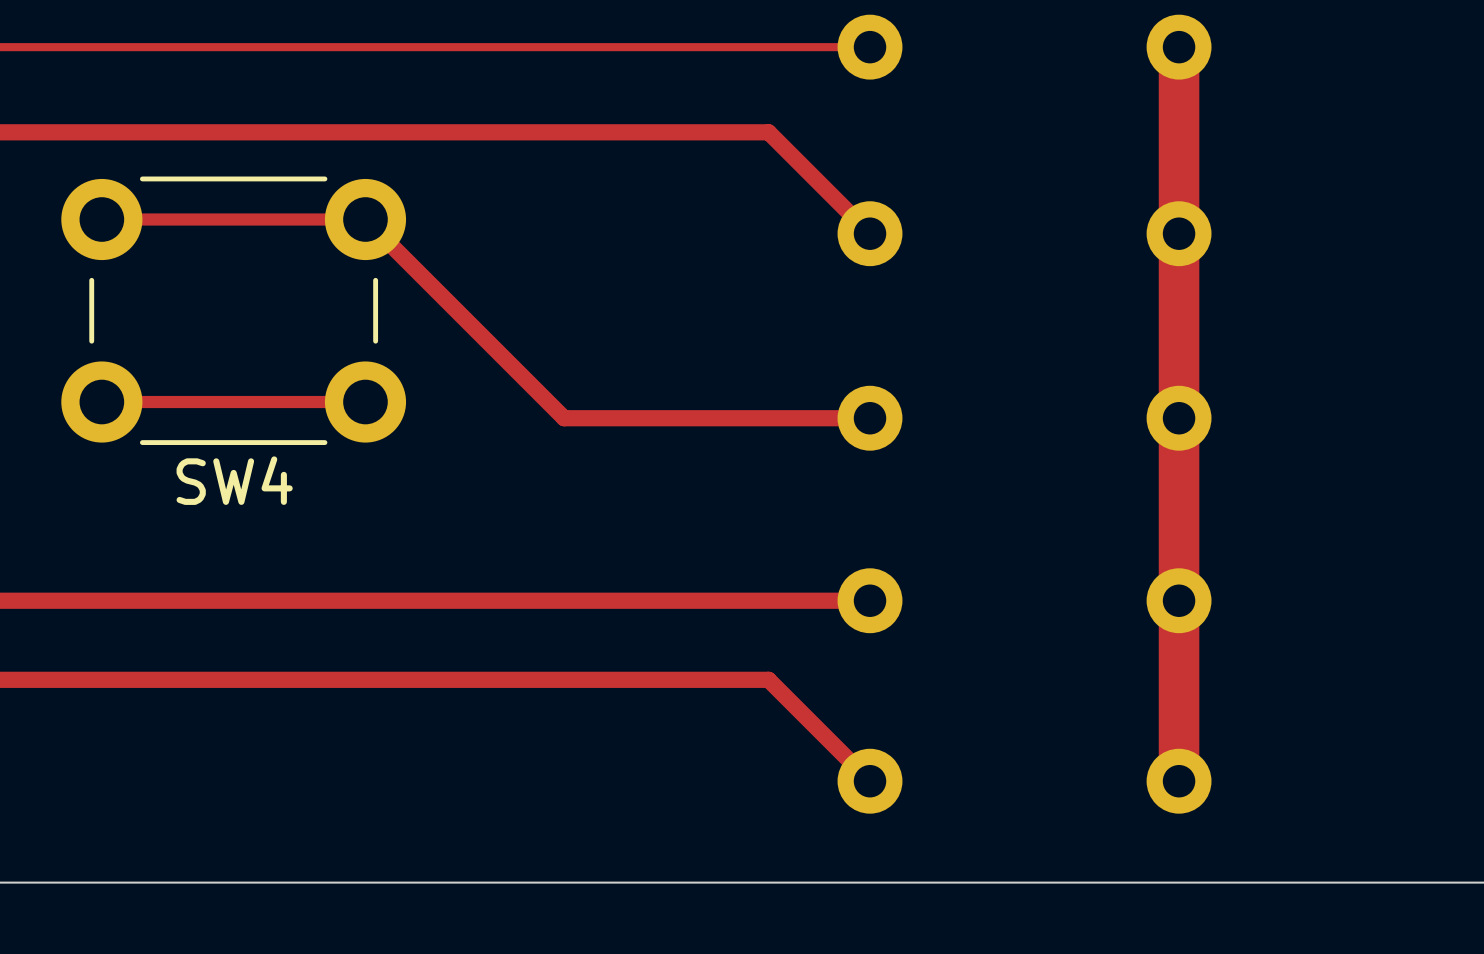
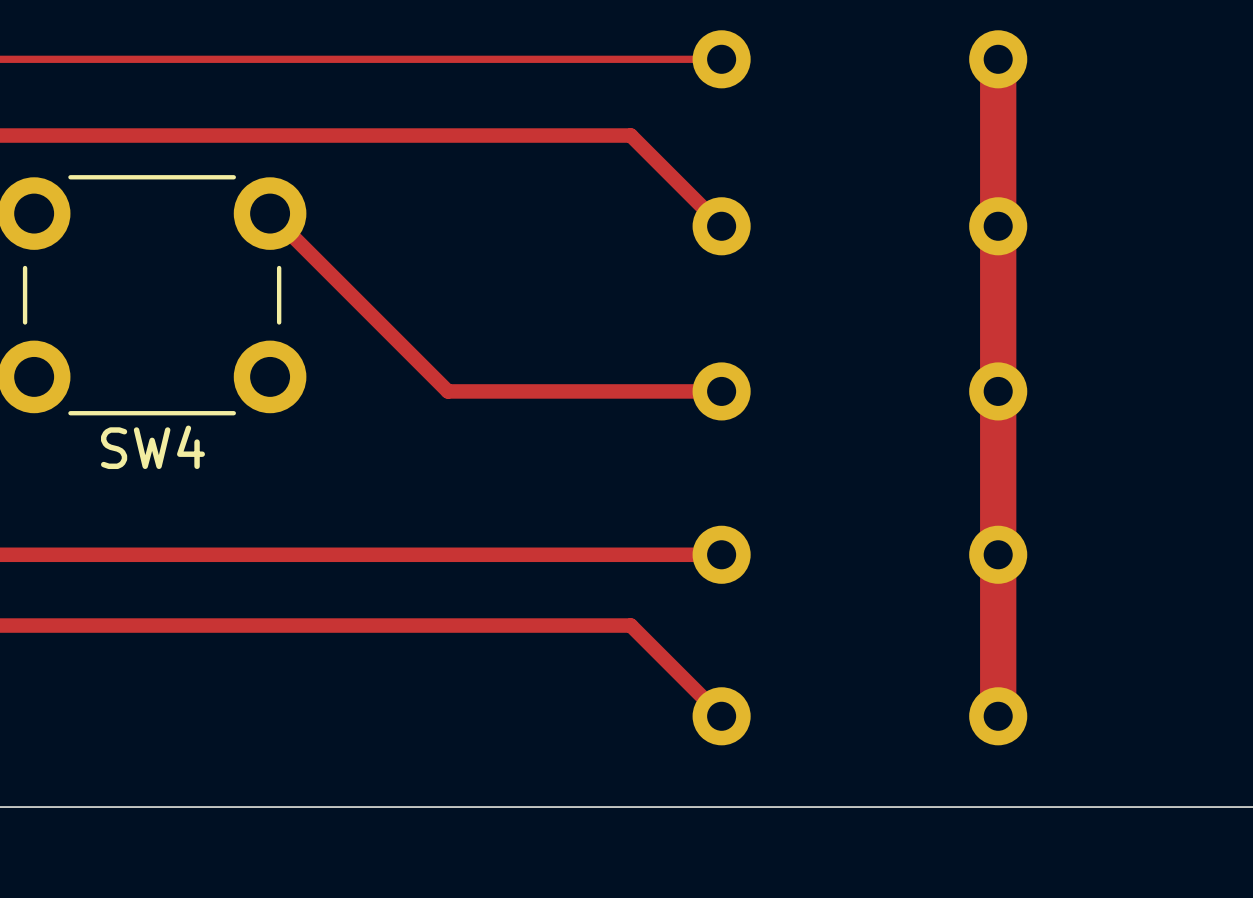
track: (101, 219) (365, 219) -> none
track: (101, 402) (365, 402) -> none

